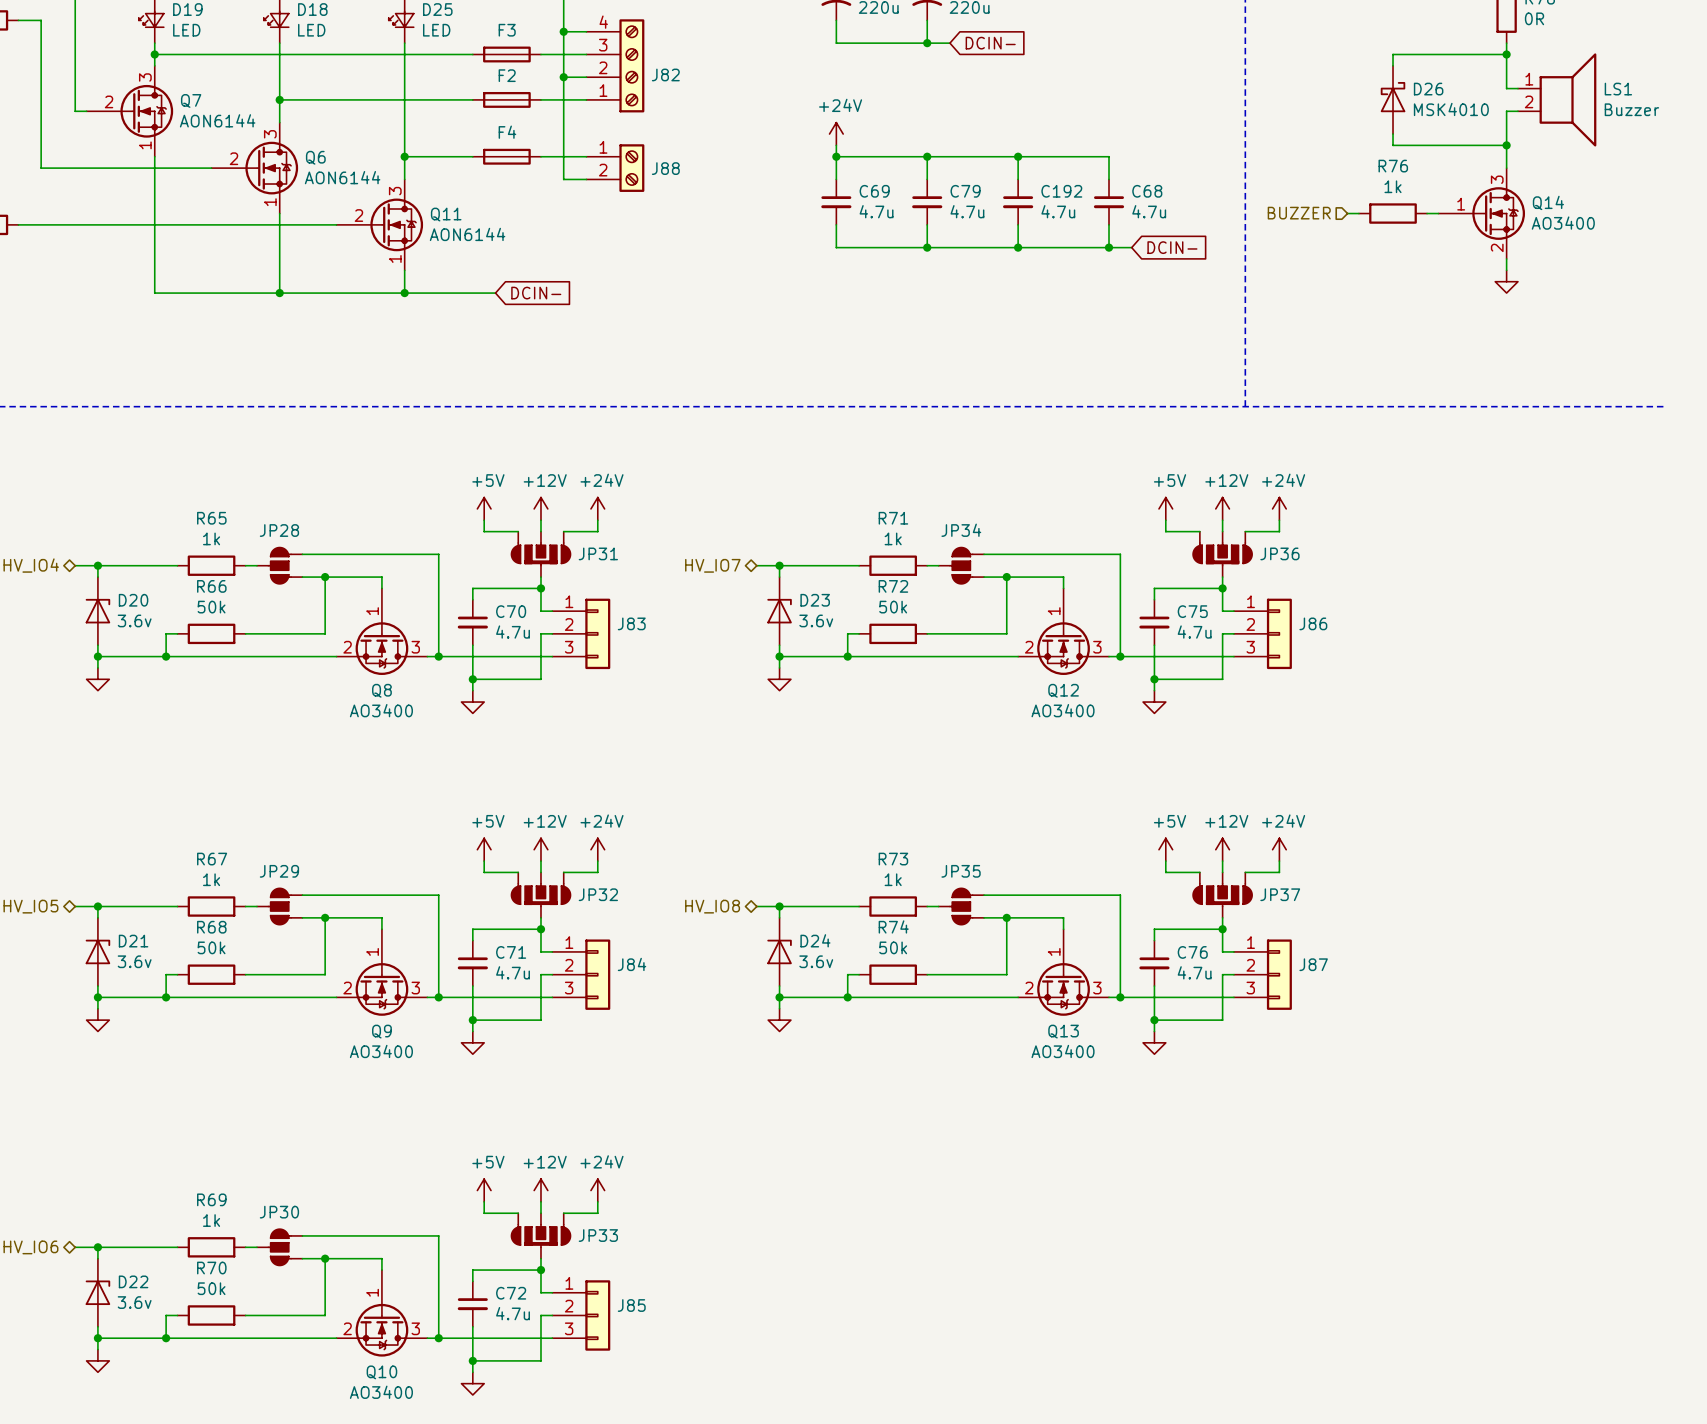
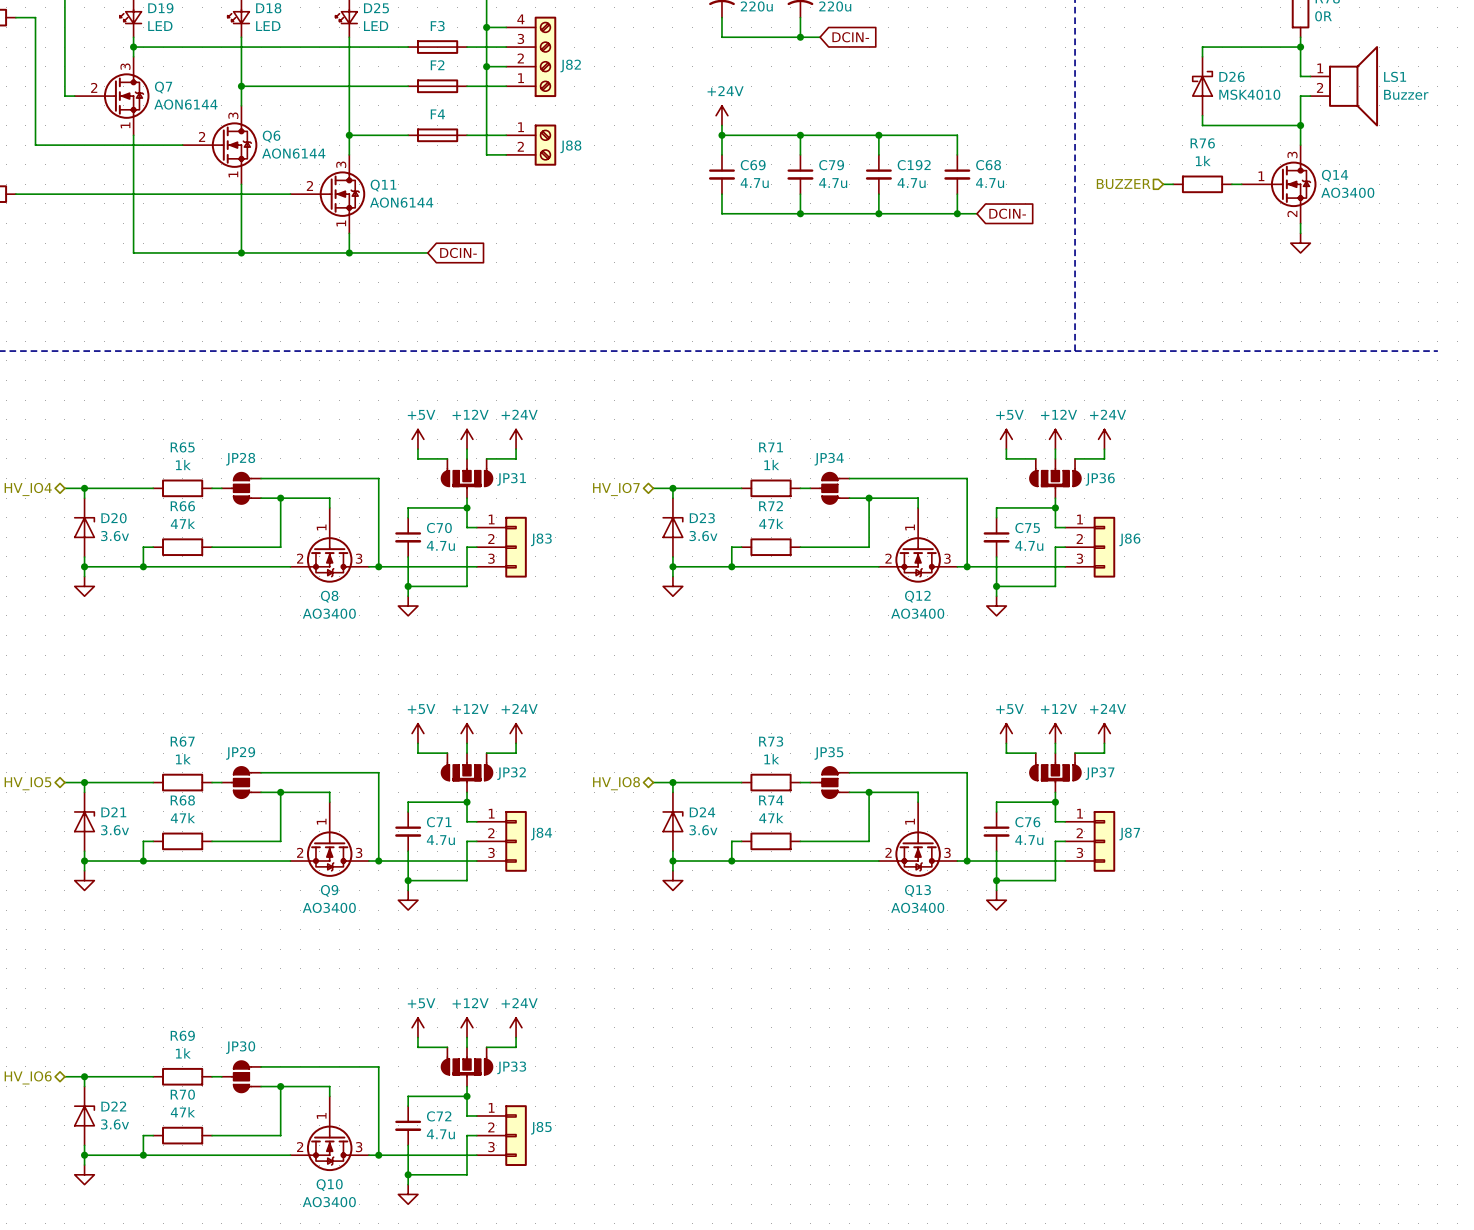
R66 value: 50k (211, 607) -> 47k (182, 523)
R72 value: 50k (893, 607) -> 47k (771, 523)
R68 value: 50k (211, 947) -> 47k (182, 818)
R74 value: 50k (893, 947) -> 47k (771, 818)
R70 value: 50k (211, 1288) -> 47k (182, 1112)

